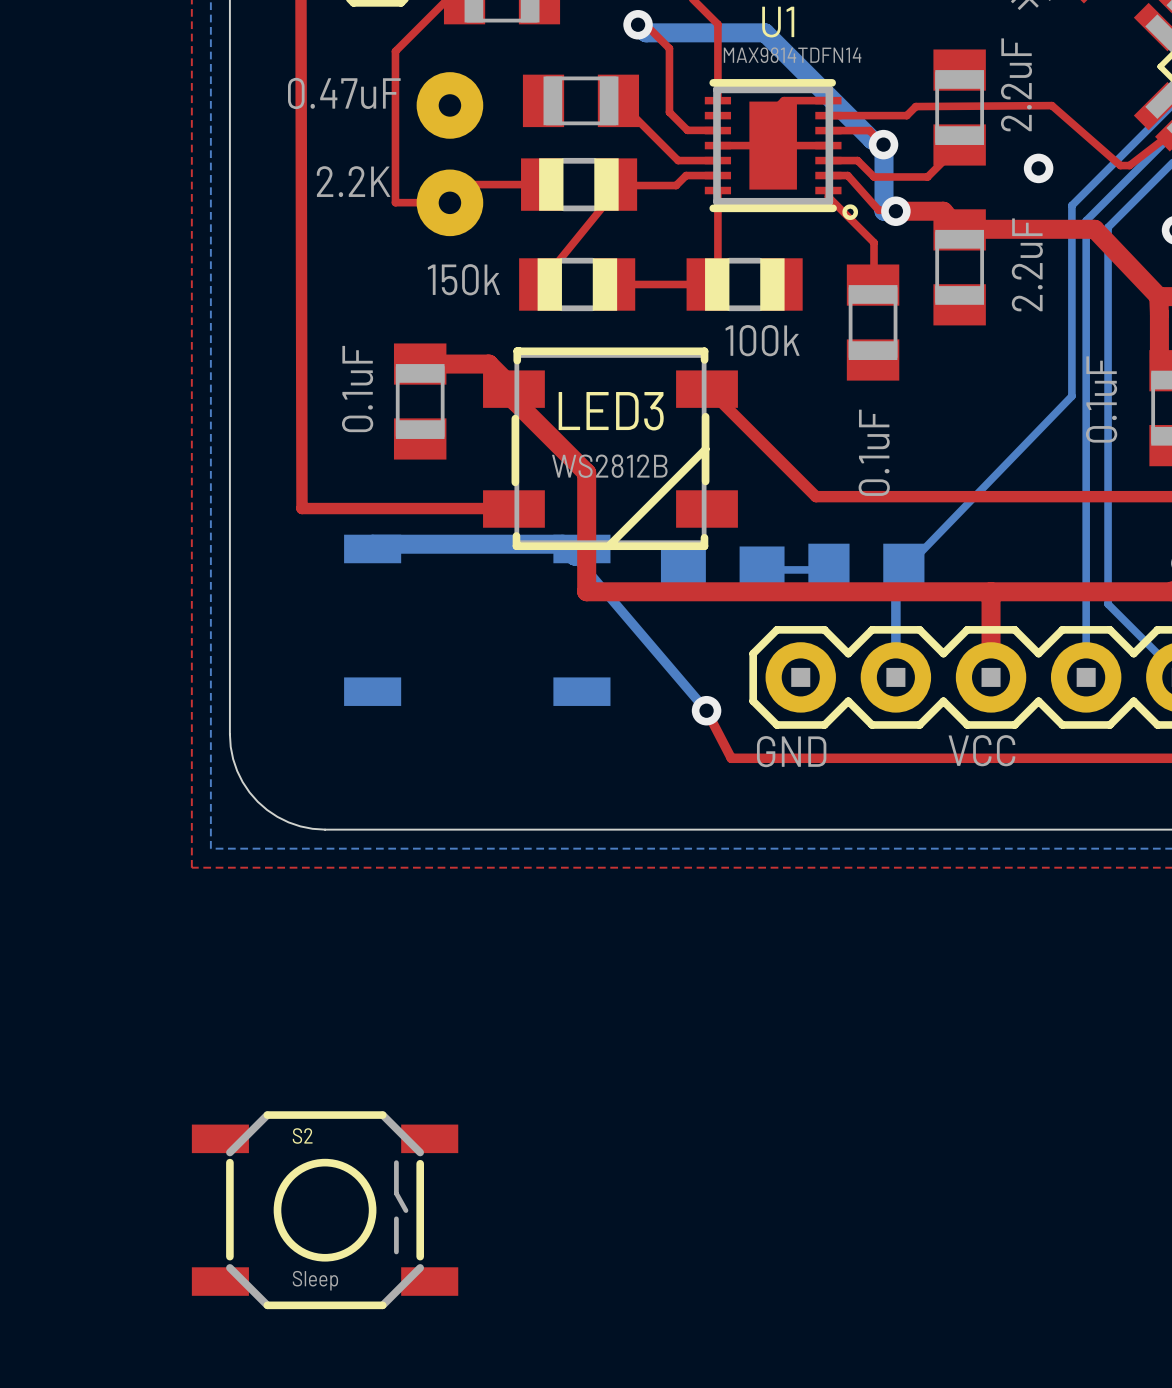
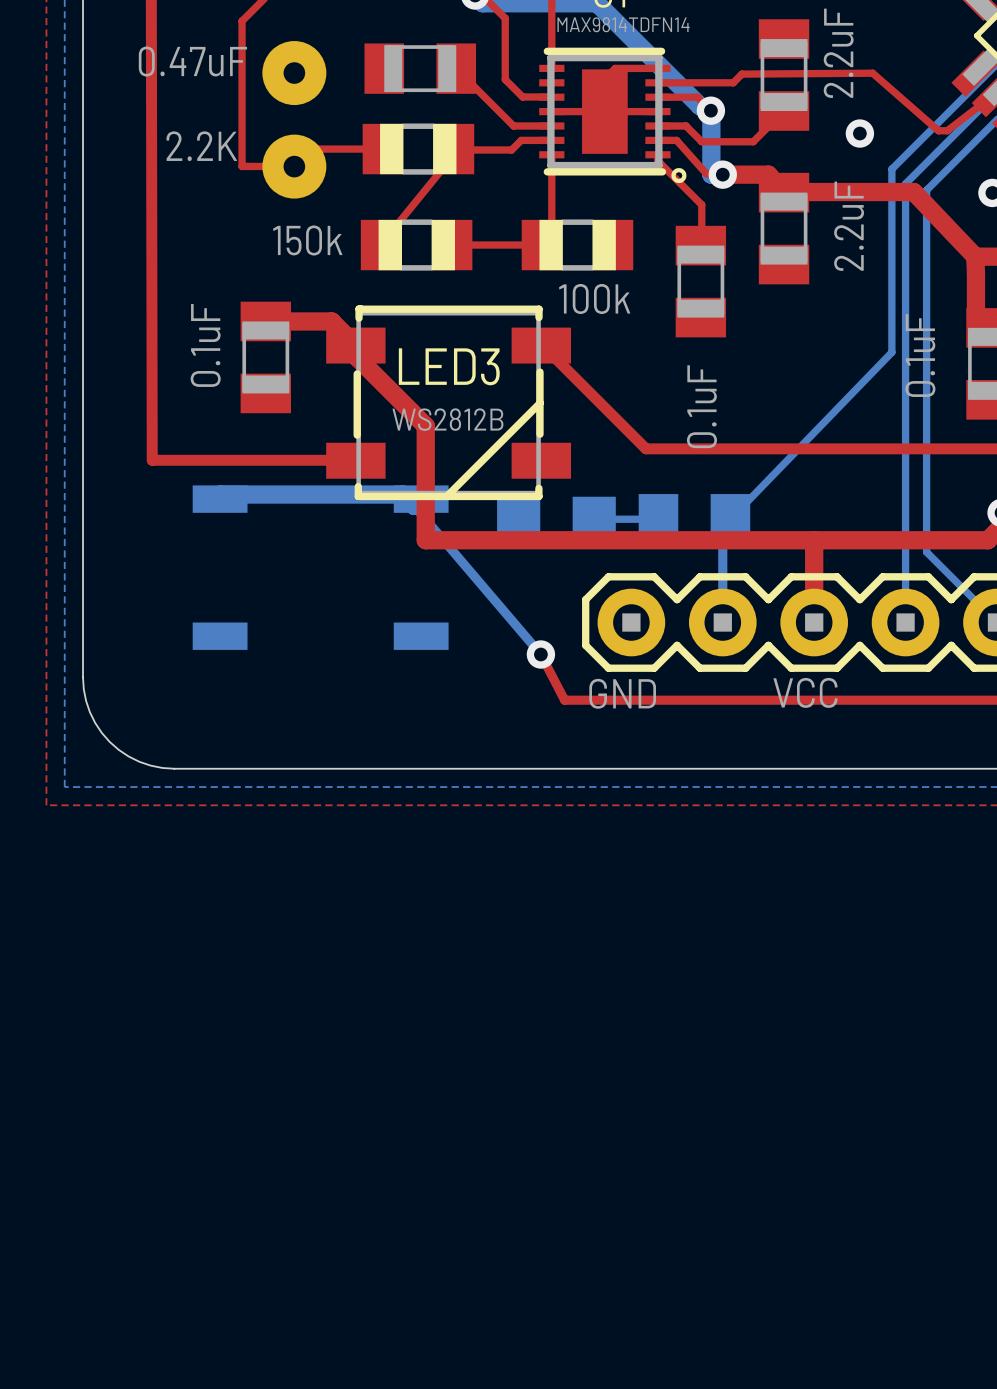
S2: Sleep (325, 1210) -> none

